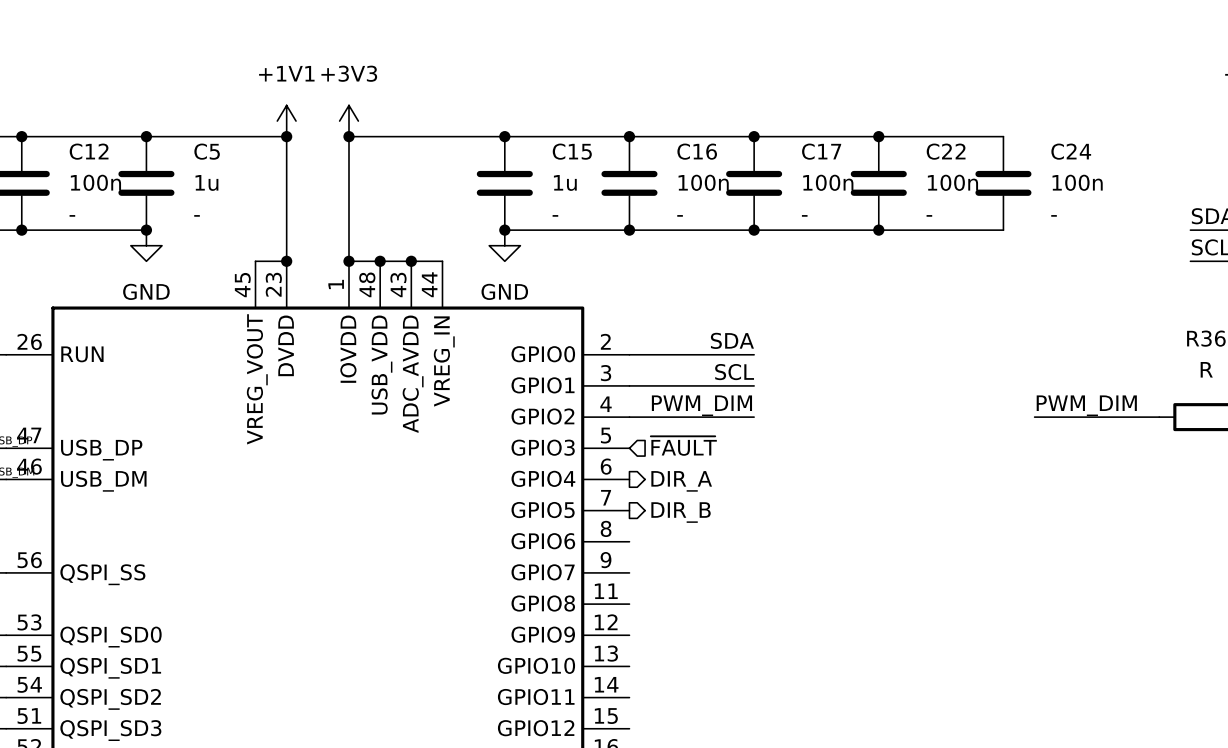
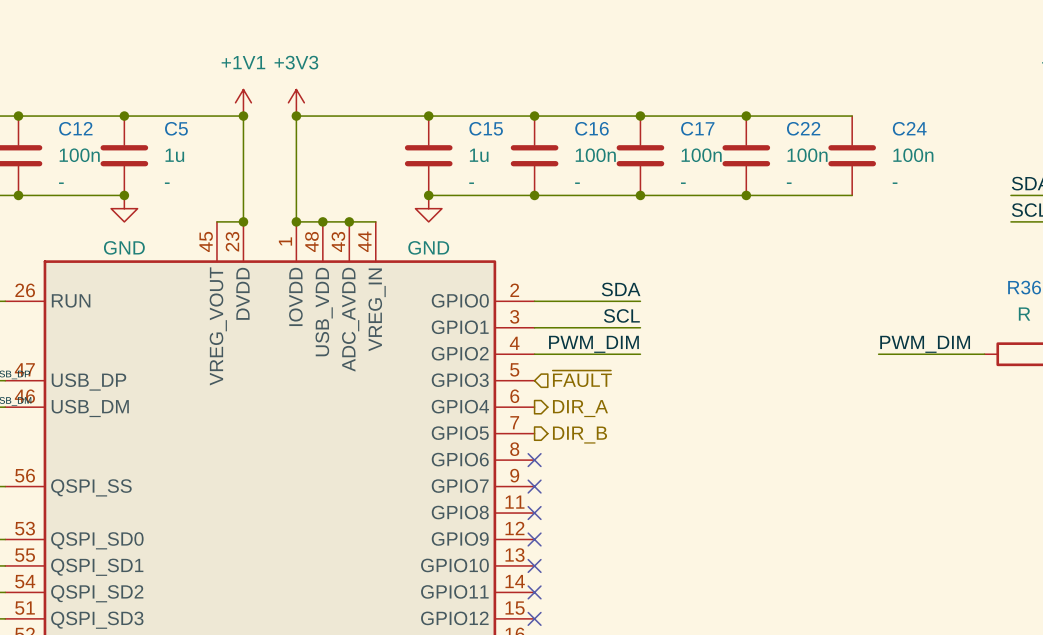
no-connect mark: none -> (534, 460)
no-connect mark: none -> (534, 486)
no-connect mark: none -> (534, 513)
no-connect mark: none -> (534, 539)
no-connect mark: none -> (534, 565)
no-connect mark: none -> (534, 592)
no-connect mark: none -> (534, 618)

